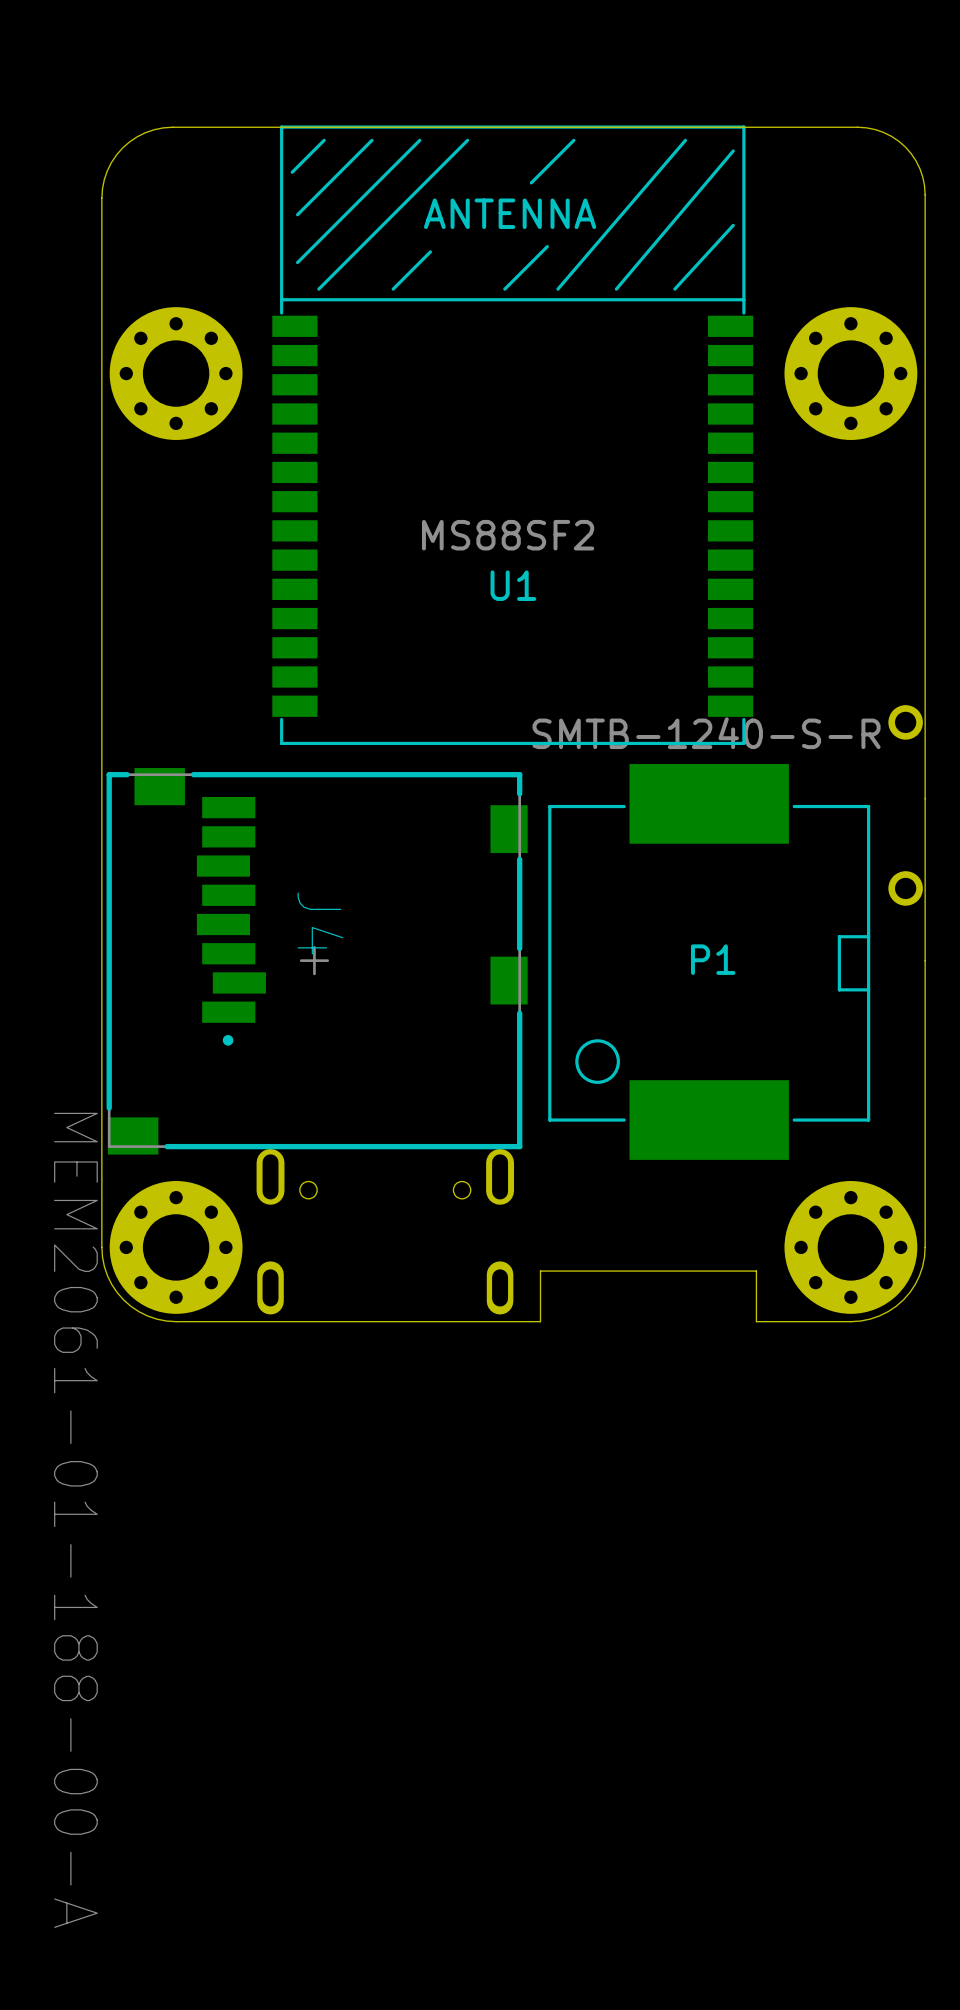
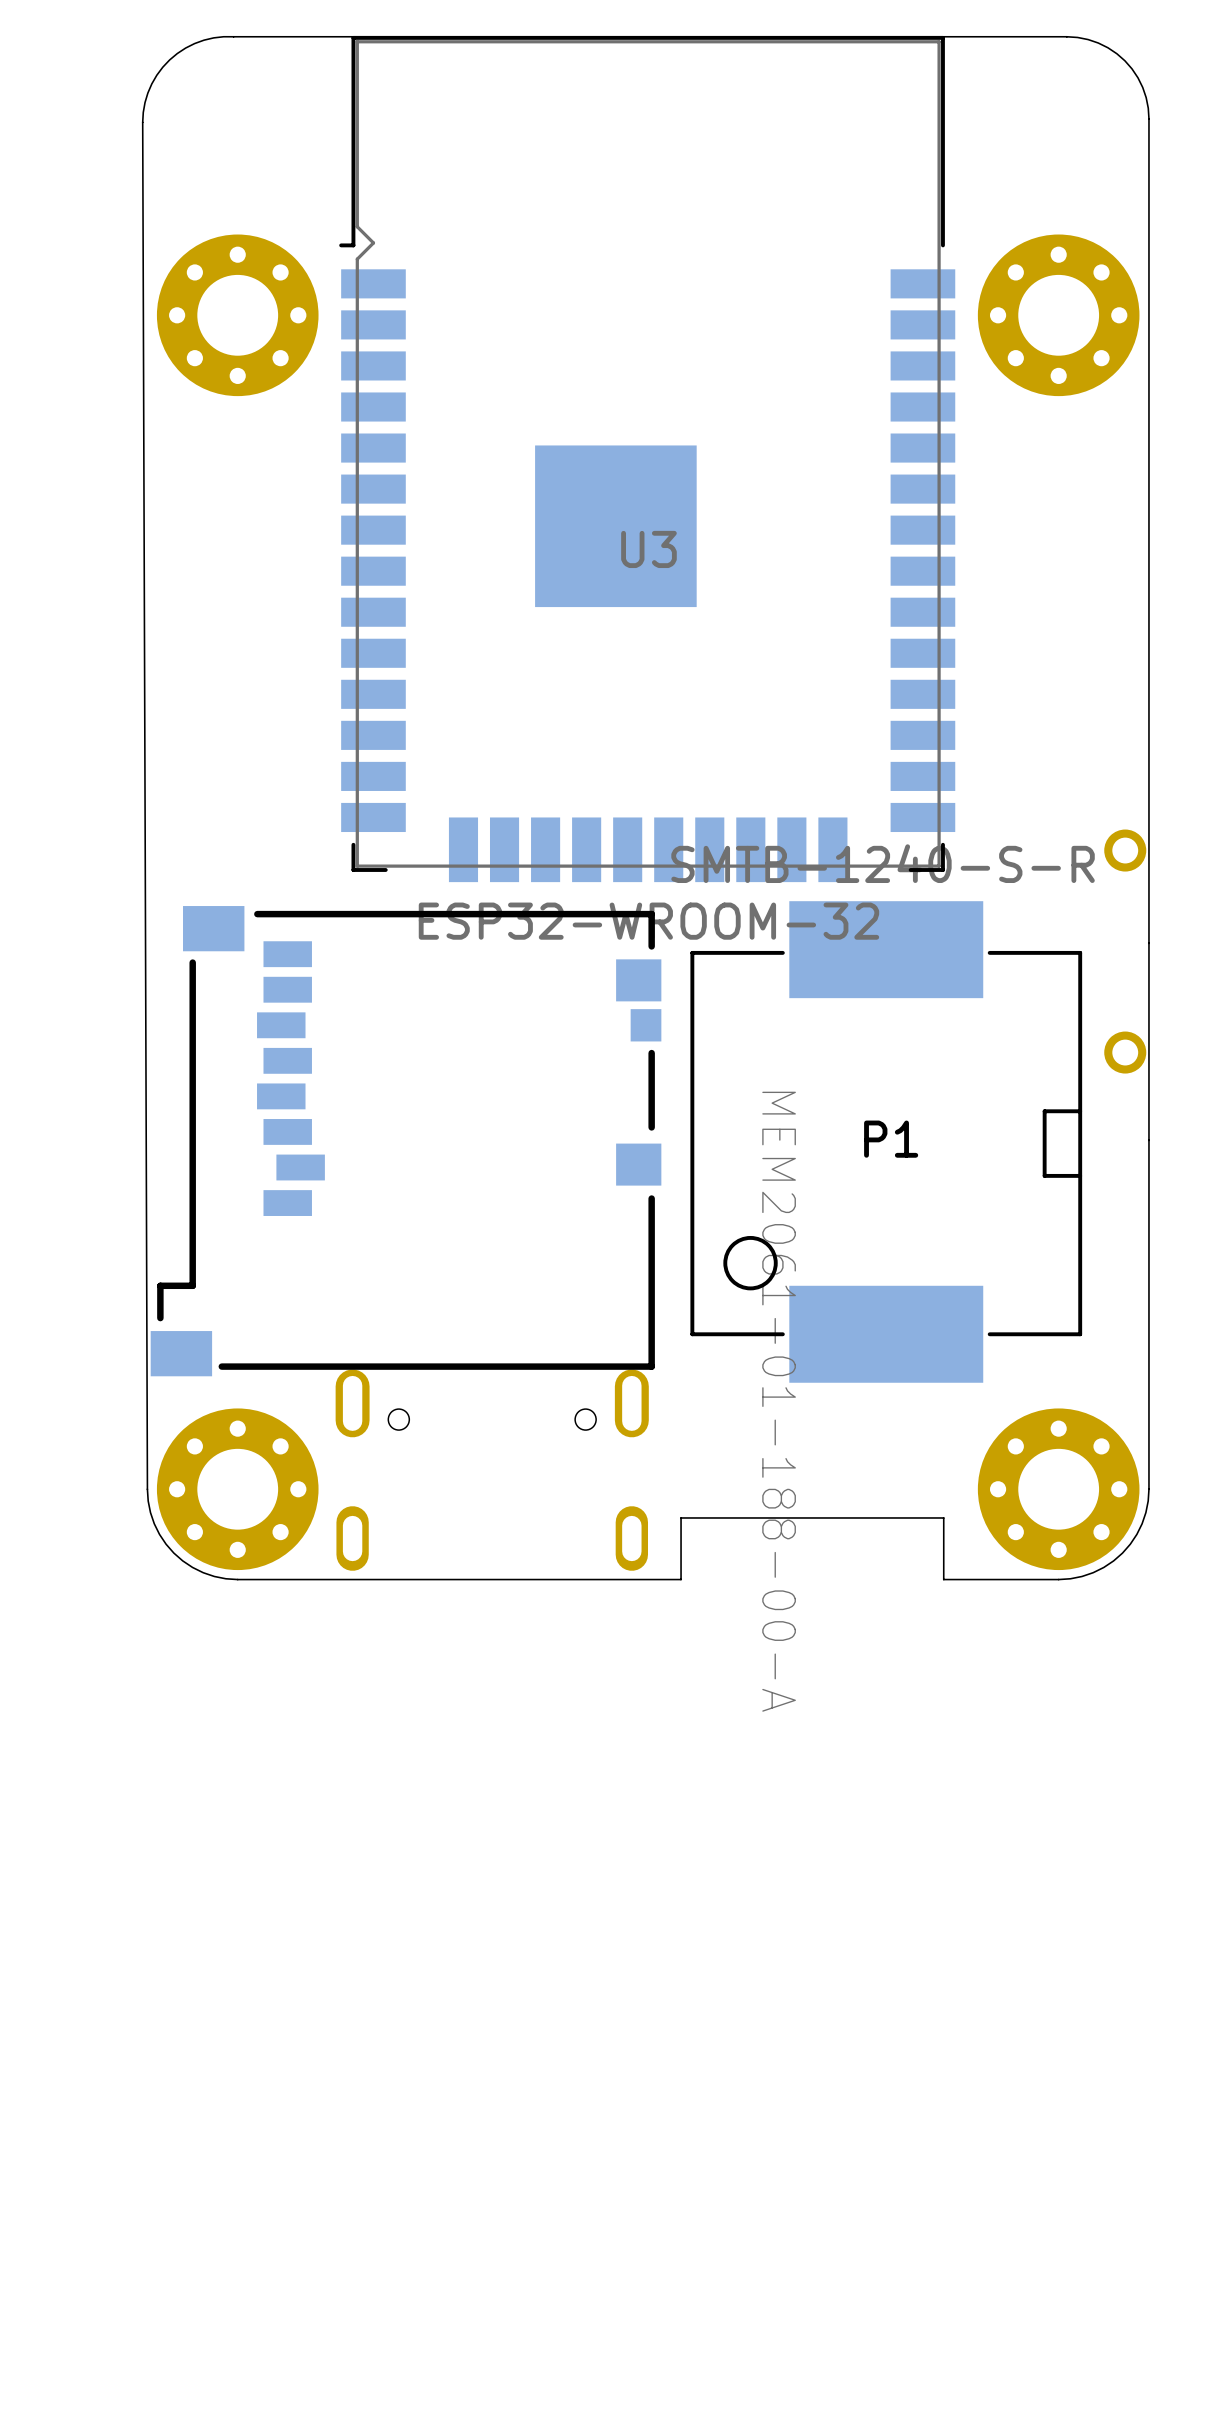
board edge: (925, 194) (920, 168) (905, 147) (883, 132) (857, 127) (172, 127) (154, 129) (137, 136) (116, 154) (104, 179) (101, 198) (101, 1247) -> (1148, 208) (1148, 118) (1142, 87) (1132, 68) (1116, 53) (1098, 43) (1077, 37) (223, 36) (204, 40) (185, 48) (162, 67) (147, 93) (142, 122) (147, 1489)
part position: (176, 373) -> (237, 315)
part position: (850, 373) -> (1058, 315)
U3: none -> ESP32-WROOM-32 (647, 459)
U1: MS88SF2 (512, 435) -> none
part: none -> MEM2061-01-188-00-A (406, 1141)
J4: MEM2061-01-188-00-A (317, 961) -> none

